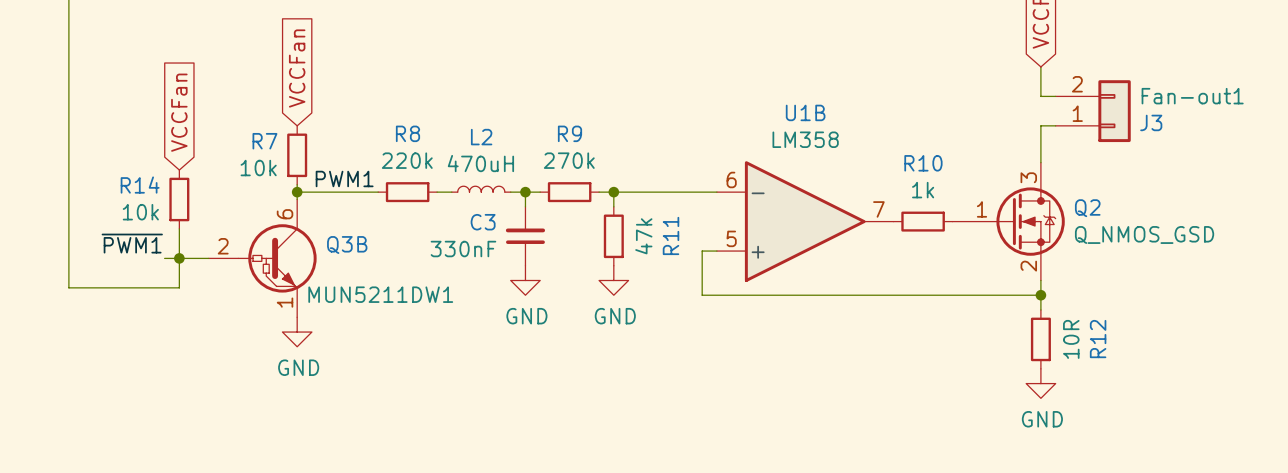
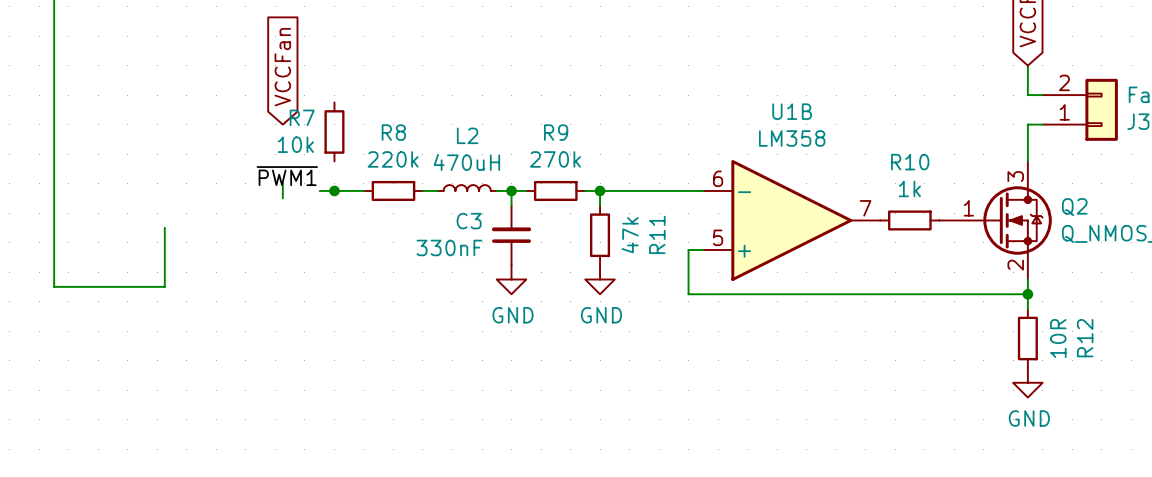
global label: VCCFan (179, 112) -> none
R7 position: (297, 155) -> (334, 131)
label: PWM1 (344, 178) -> none
wire: (297, 192) (334, 192) -> none
junction position: (297, 192) -> (334, 190)
R14: 10k (179, 199) -> none
label position: ~{PWM1} (132, 243) -> ~{PWM1} (287, 176)
wire: (164, 258) (208, 258) -> none
junction: (179, 258) -> none
Q3B: MUN5211DW1 (262, 258) -> none
power symbol: GND (297, 332) -> none

